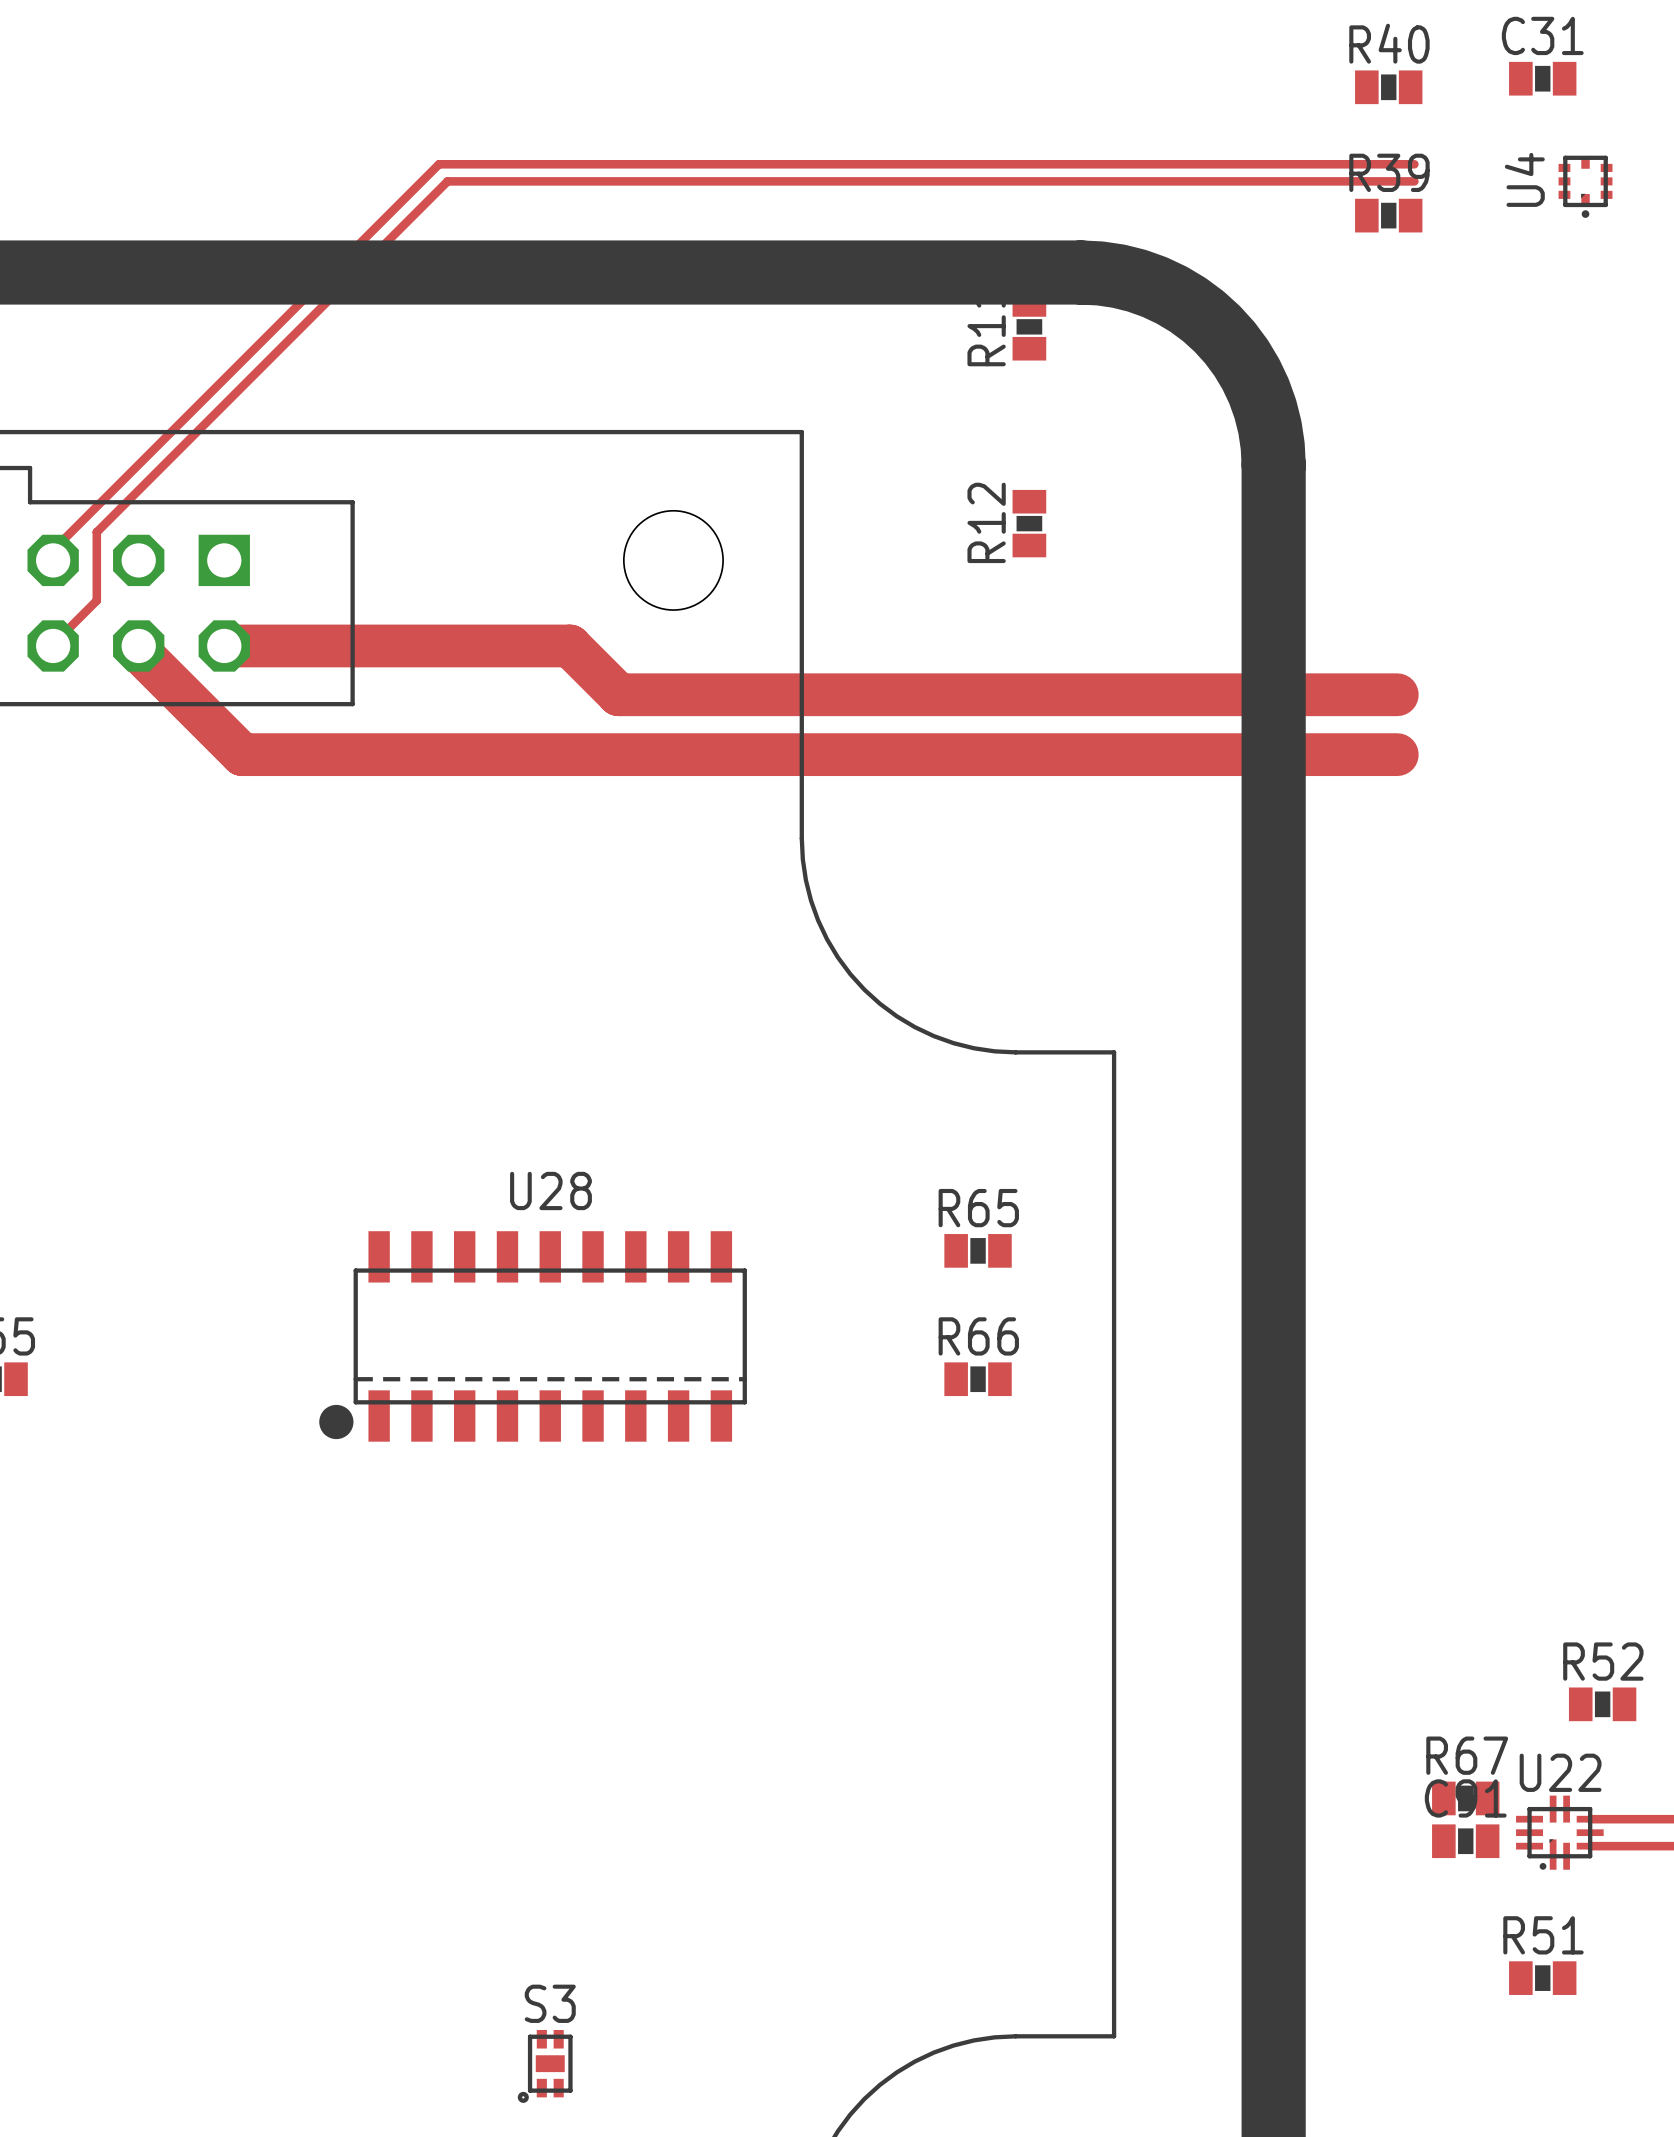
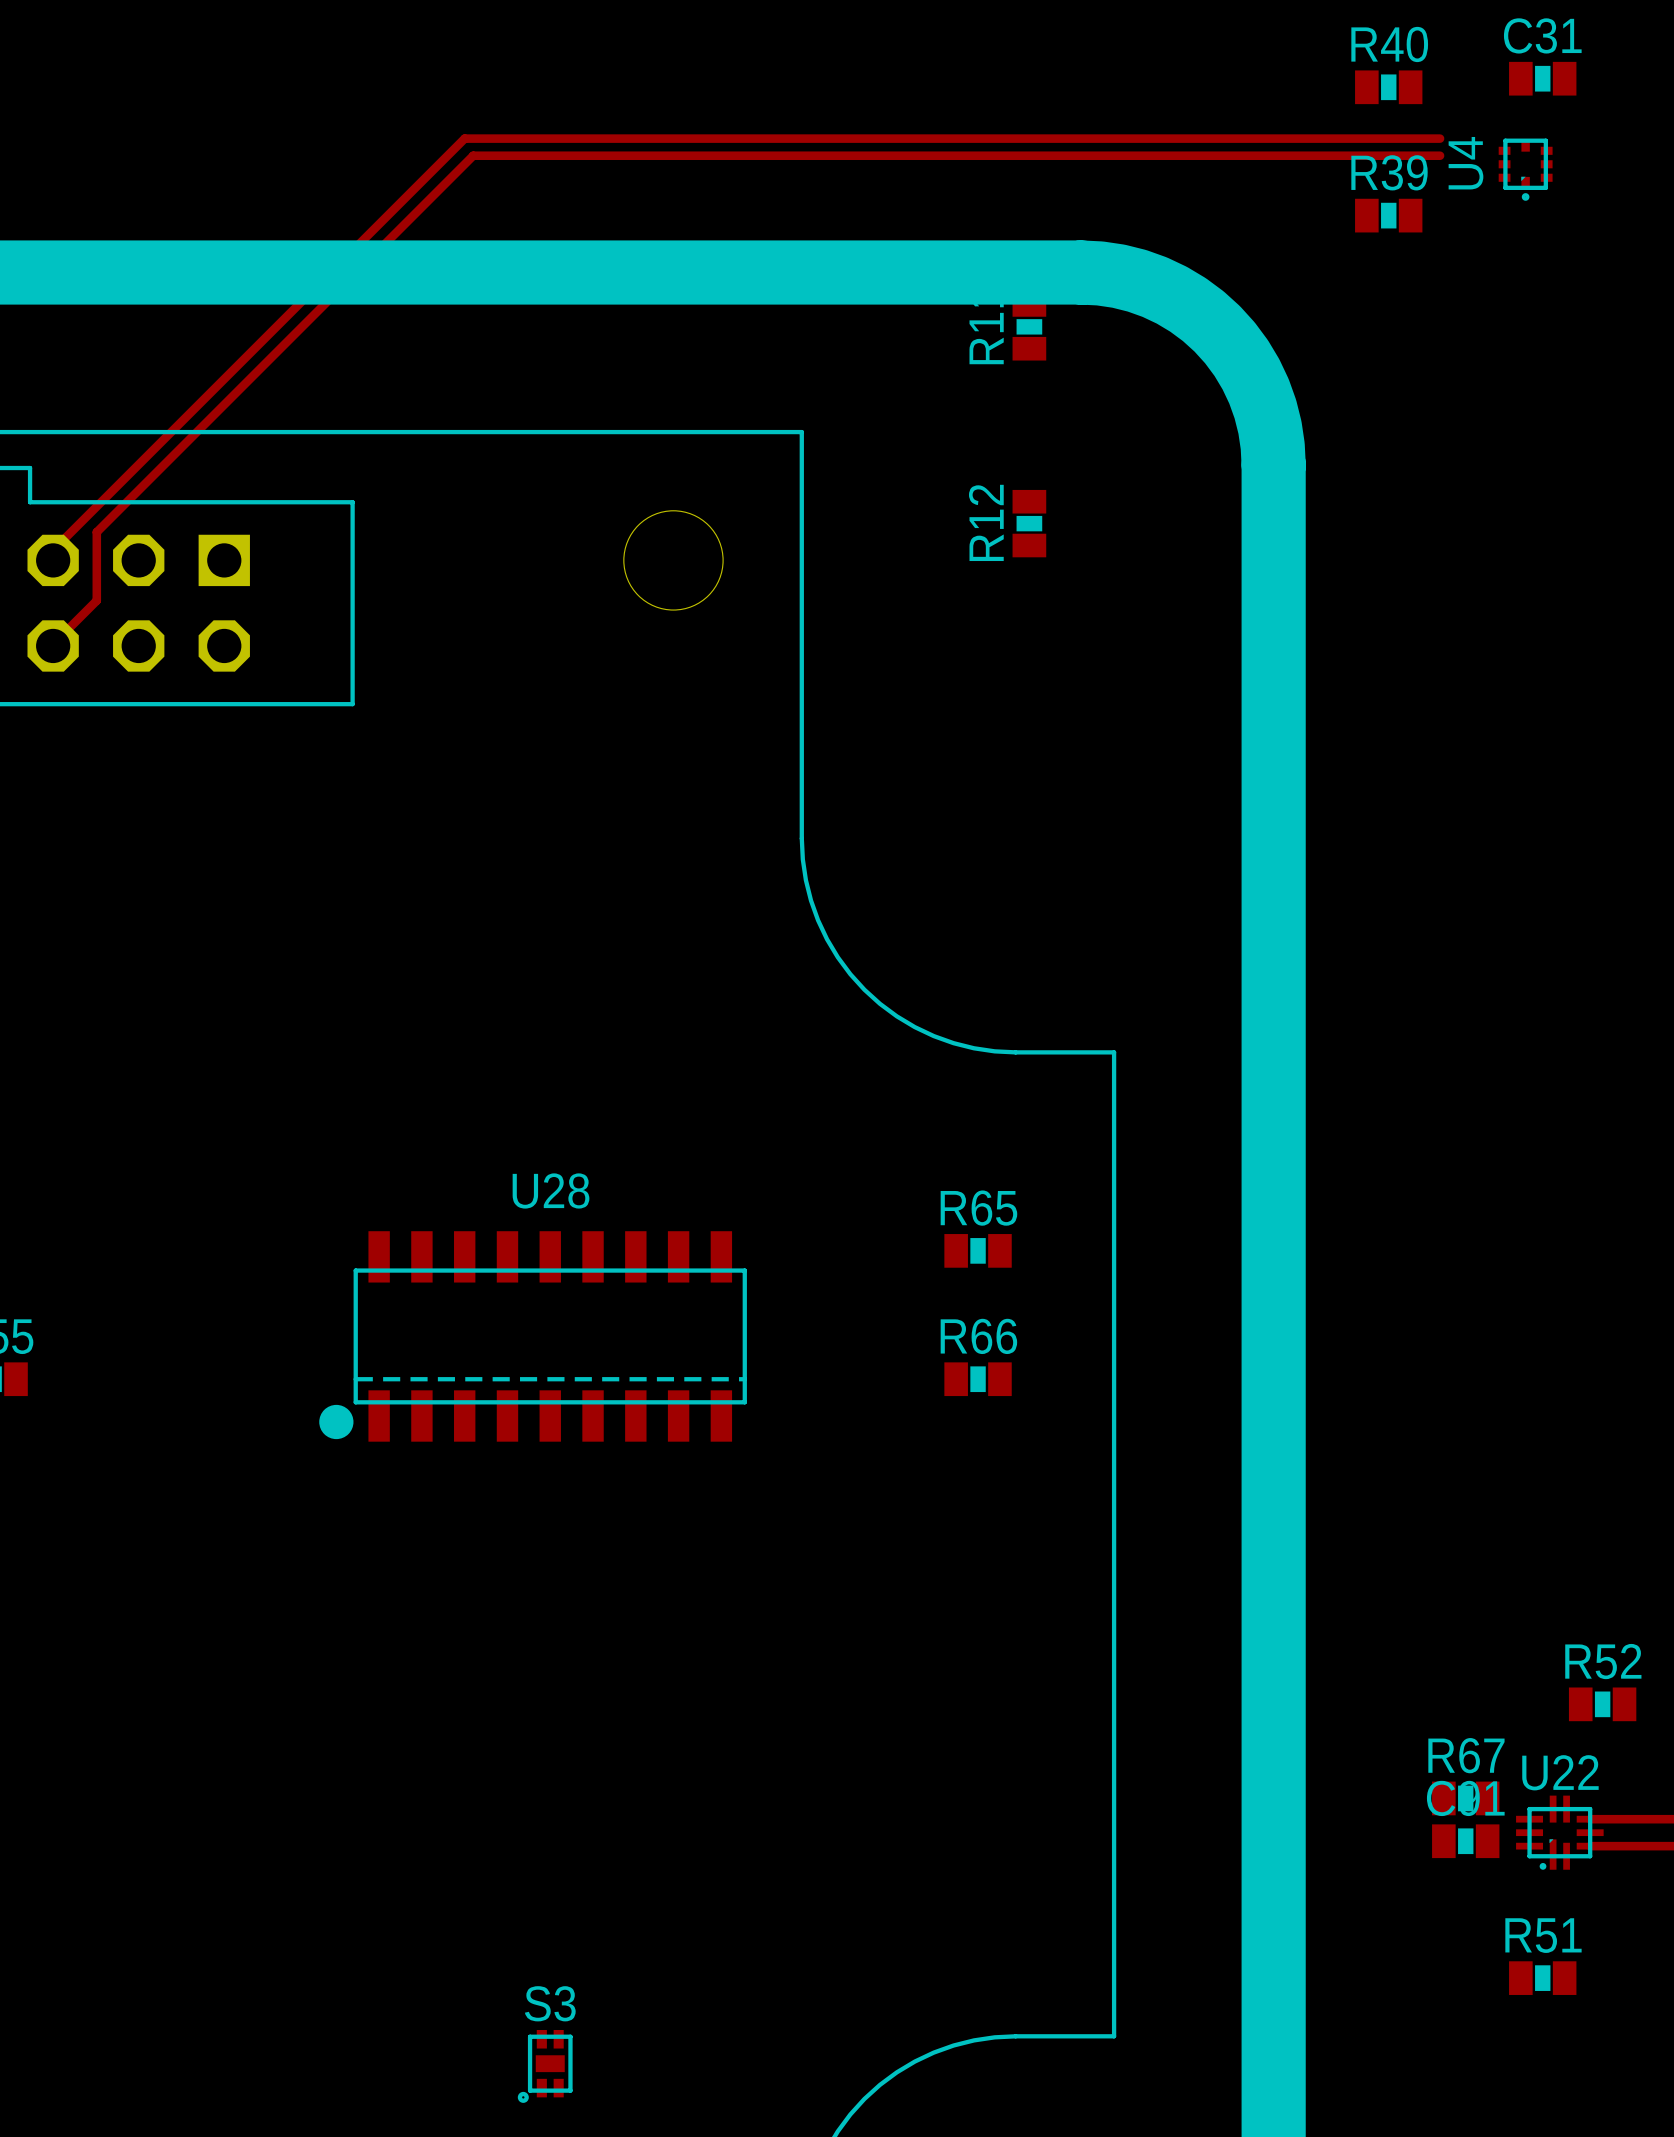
top track: (439, 164) (1414, 164) -> (439, 164) (464, 138) (1440, 138)
top track: (447, 181) (1414, 181) -> (447, 181) (473, 155) (1440, 155)
U4 position: (1585, 186) -> (1525, 169)
top track: (138, 645) (138, 651) (242, 754) (1397, 754) -> none
top track: (224, 645) (569, 645) (618, 694) (1397, 694) -> none

